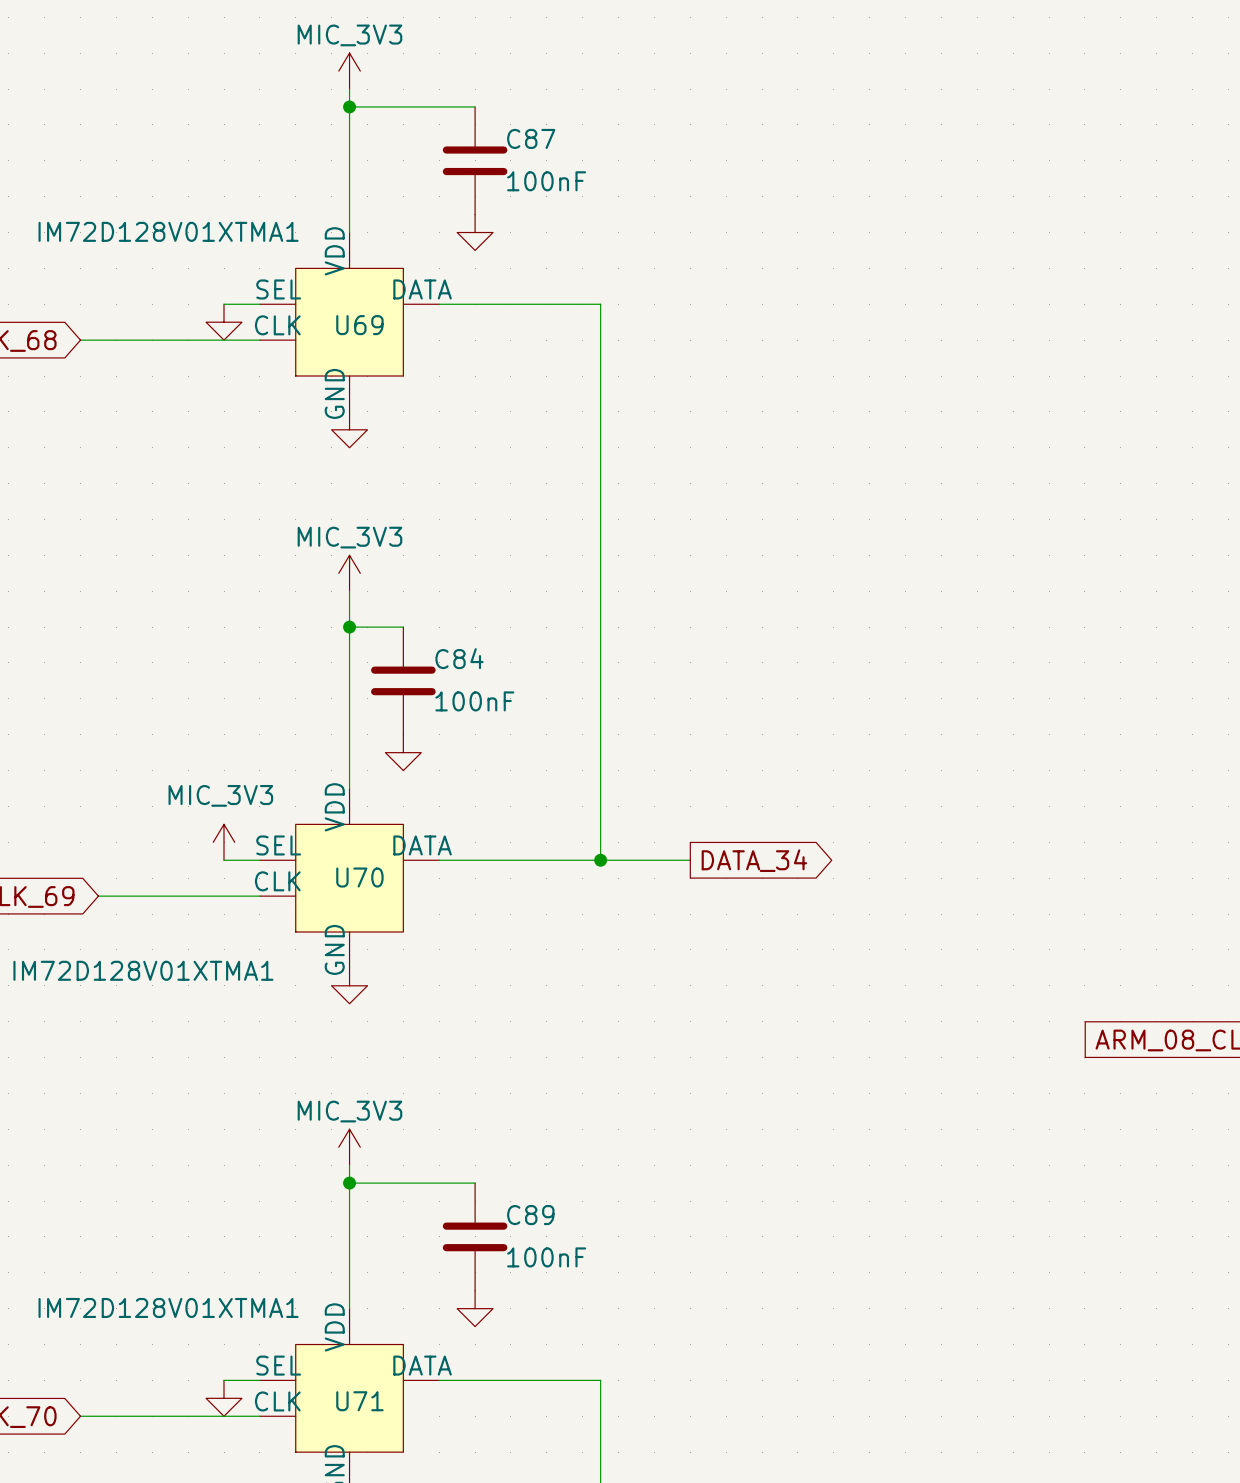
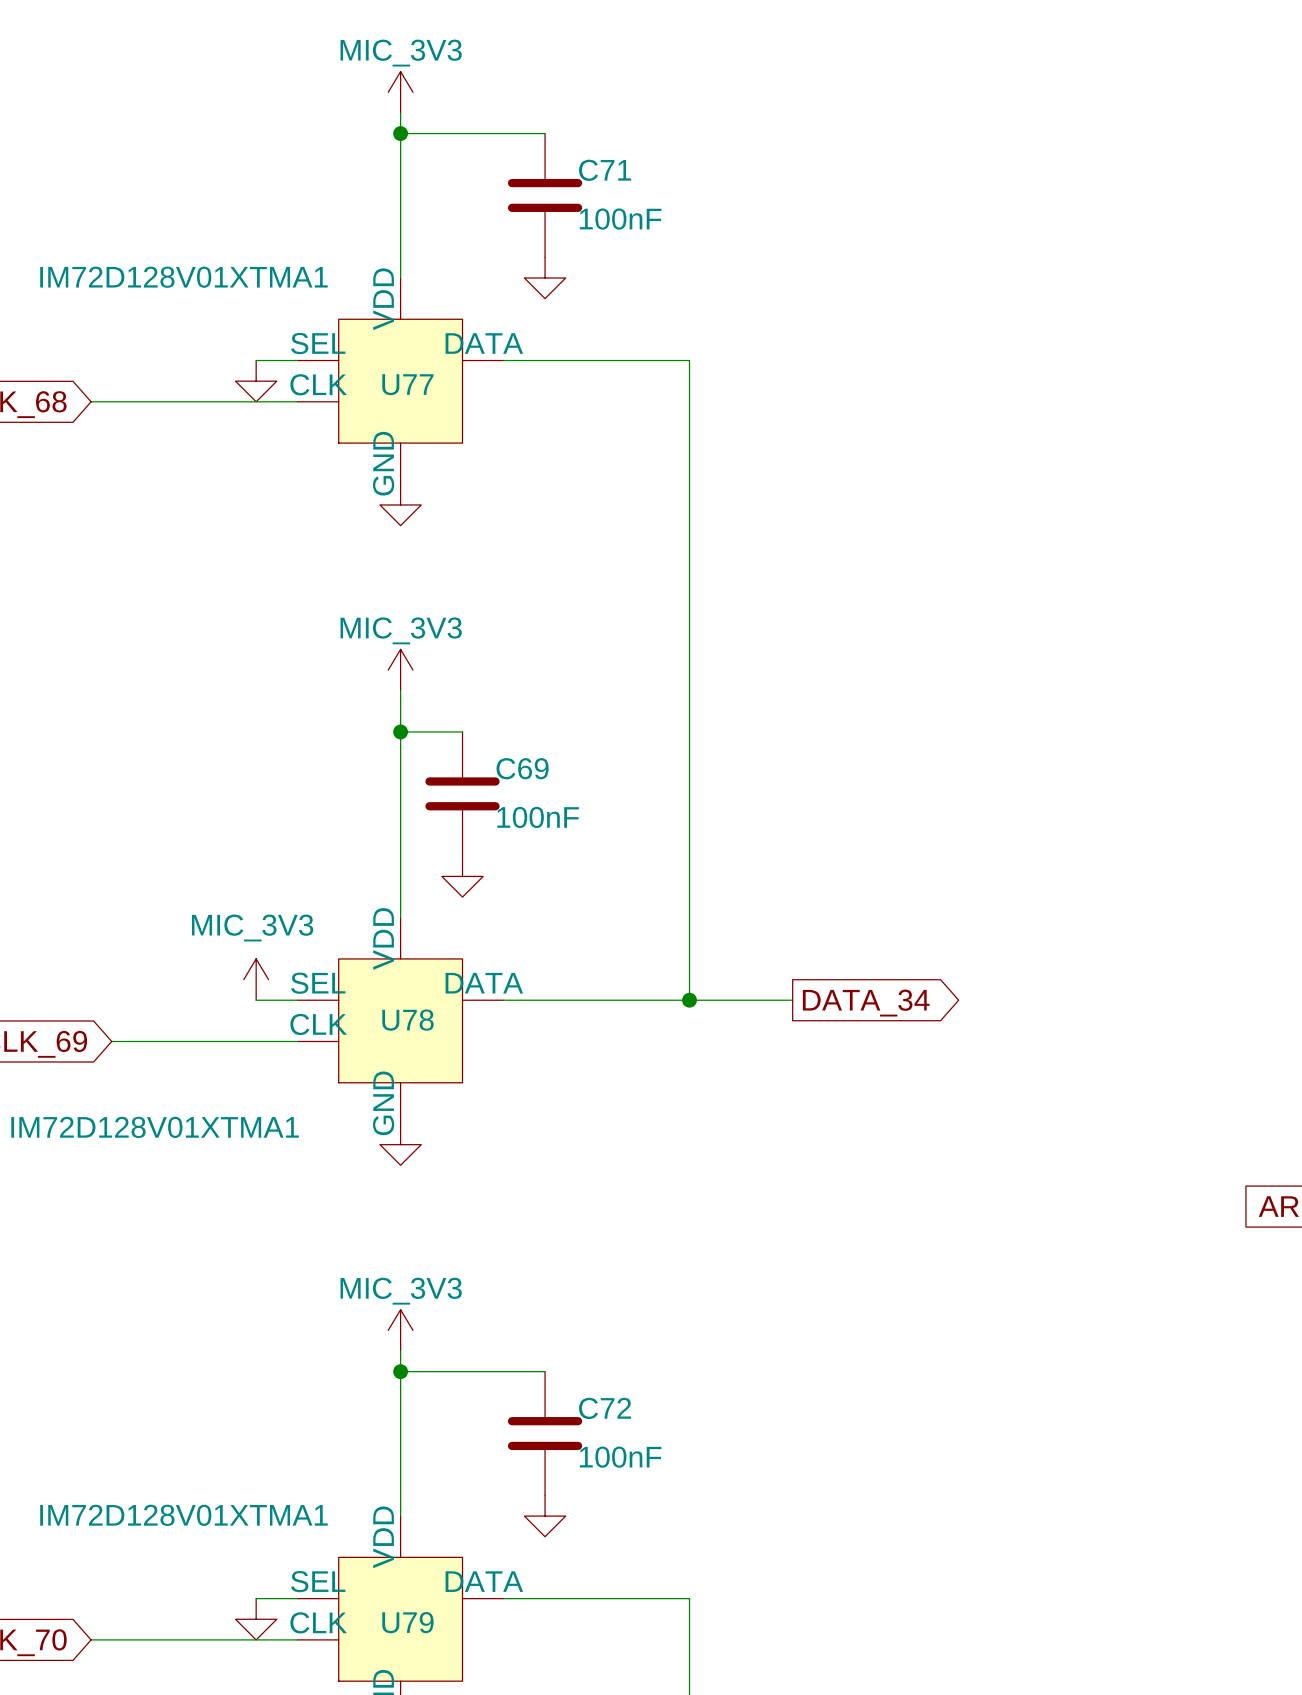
C87 name: C87 (531, 138) -> C71 (605, 170)
U69 name: U69 (359, 325) -> U77 (407, 384)
C84 name: C84 (459, 658) -> C69 (522, 768)
U70 name: U70 (359, 877) -> U78 (407, 1020)
C89 name: C89 (530, 1215) -> C72 (605, 1408)
U71 name: U71 (359, 1401) -> U79 (407, 1622)

